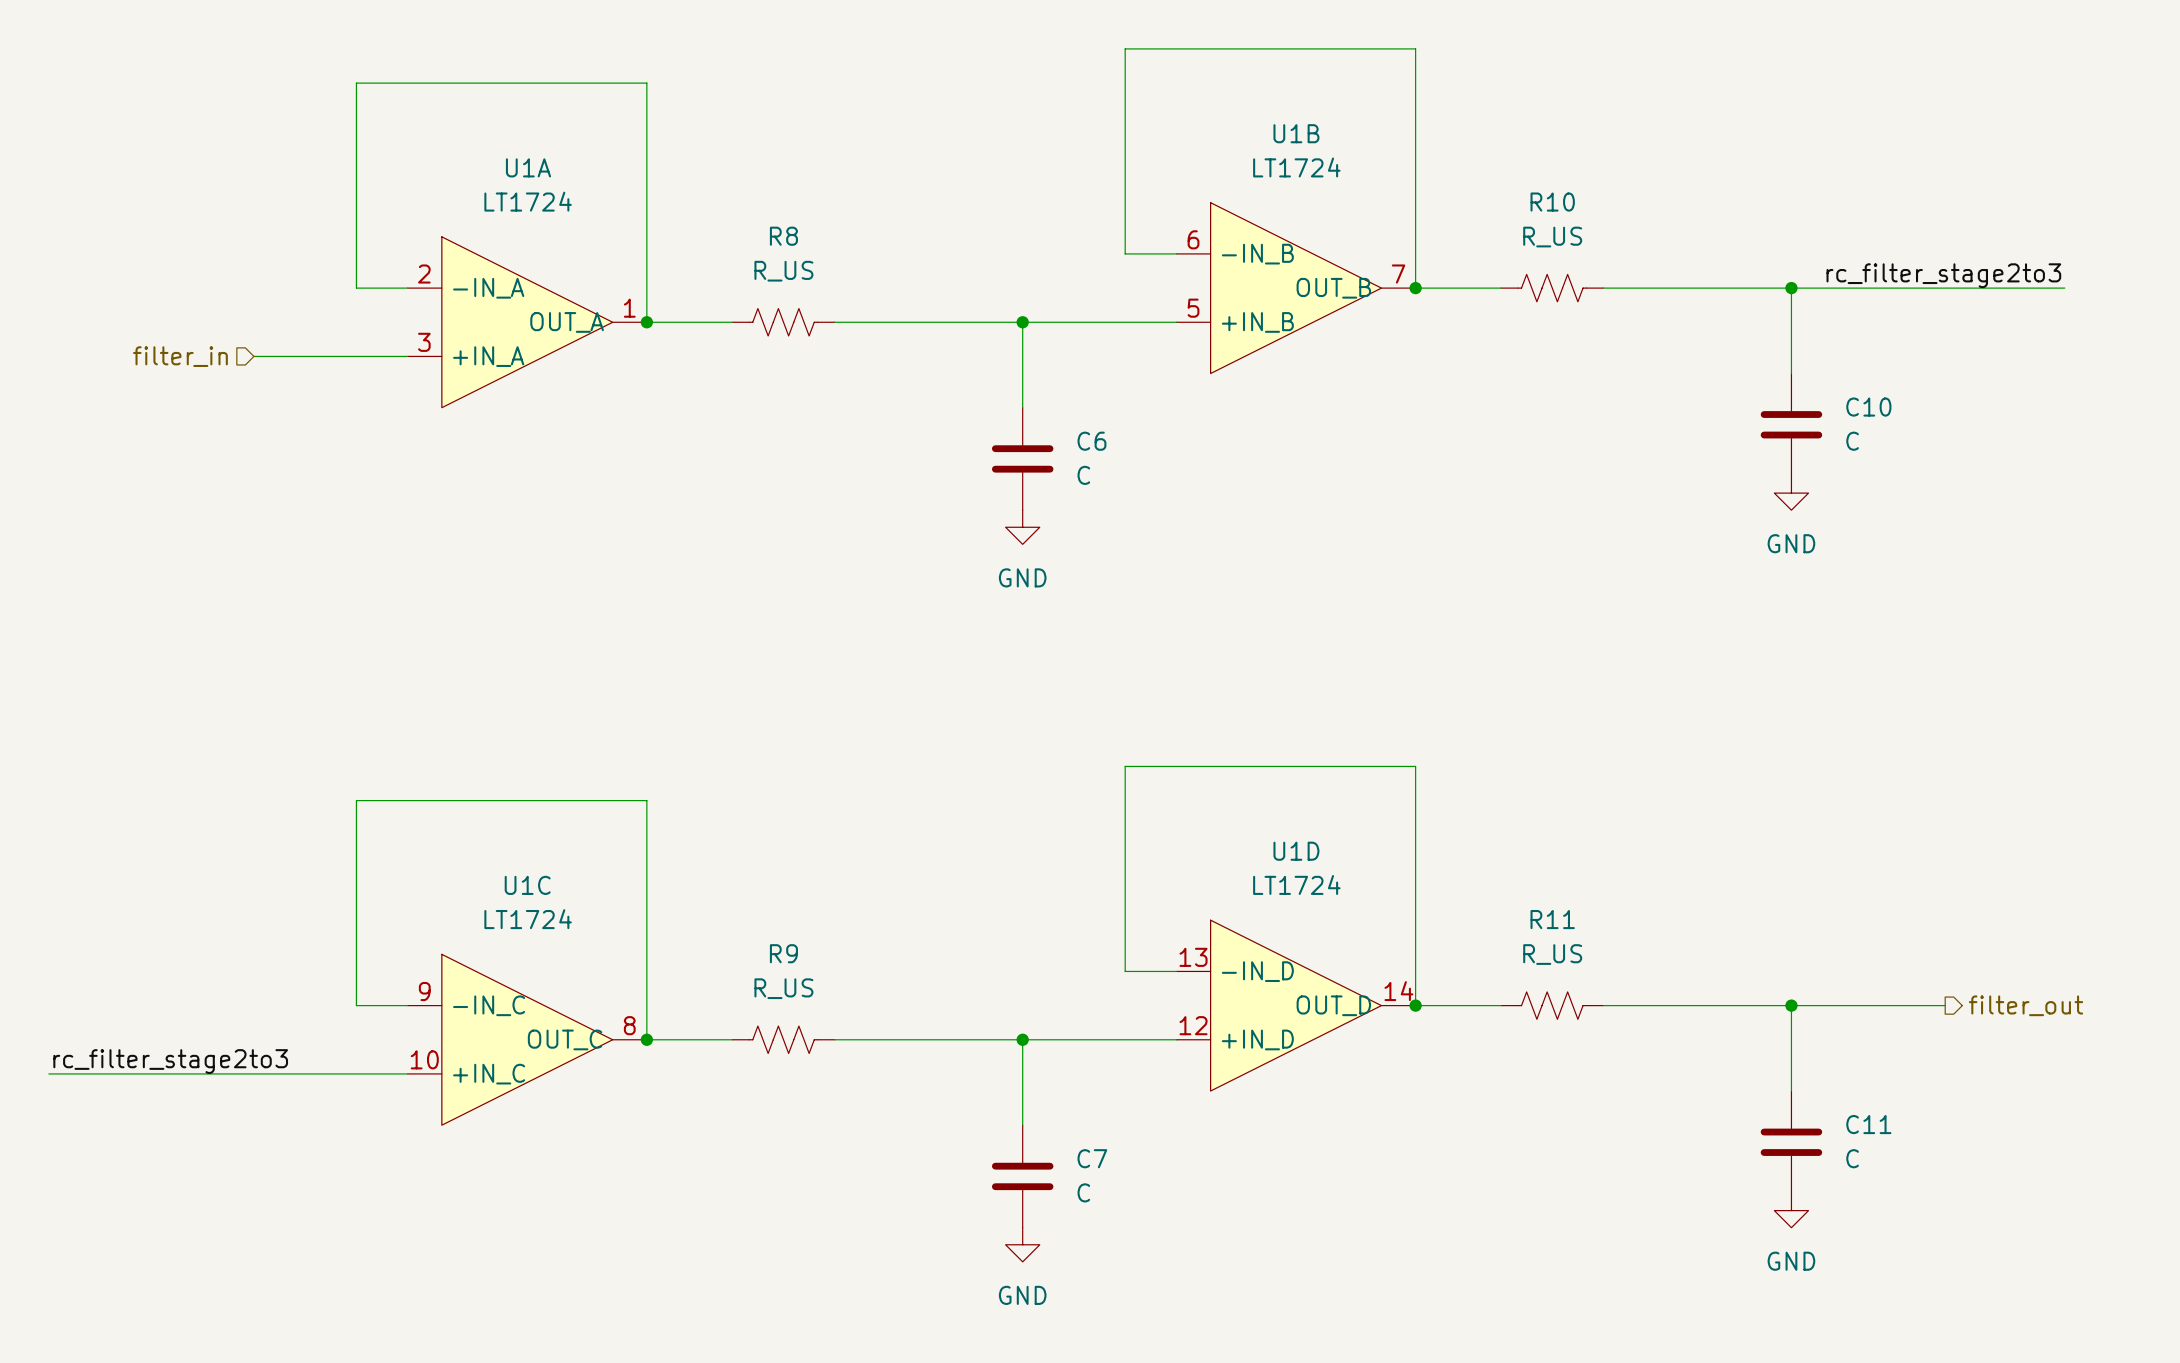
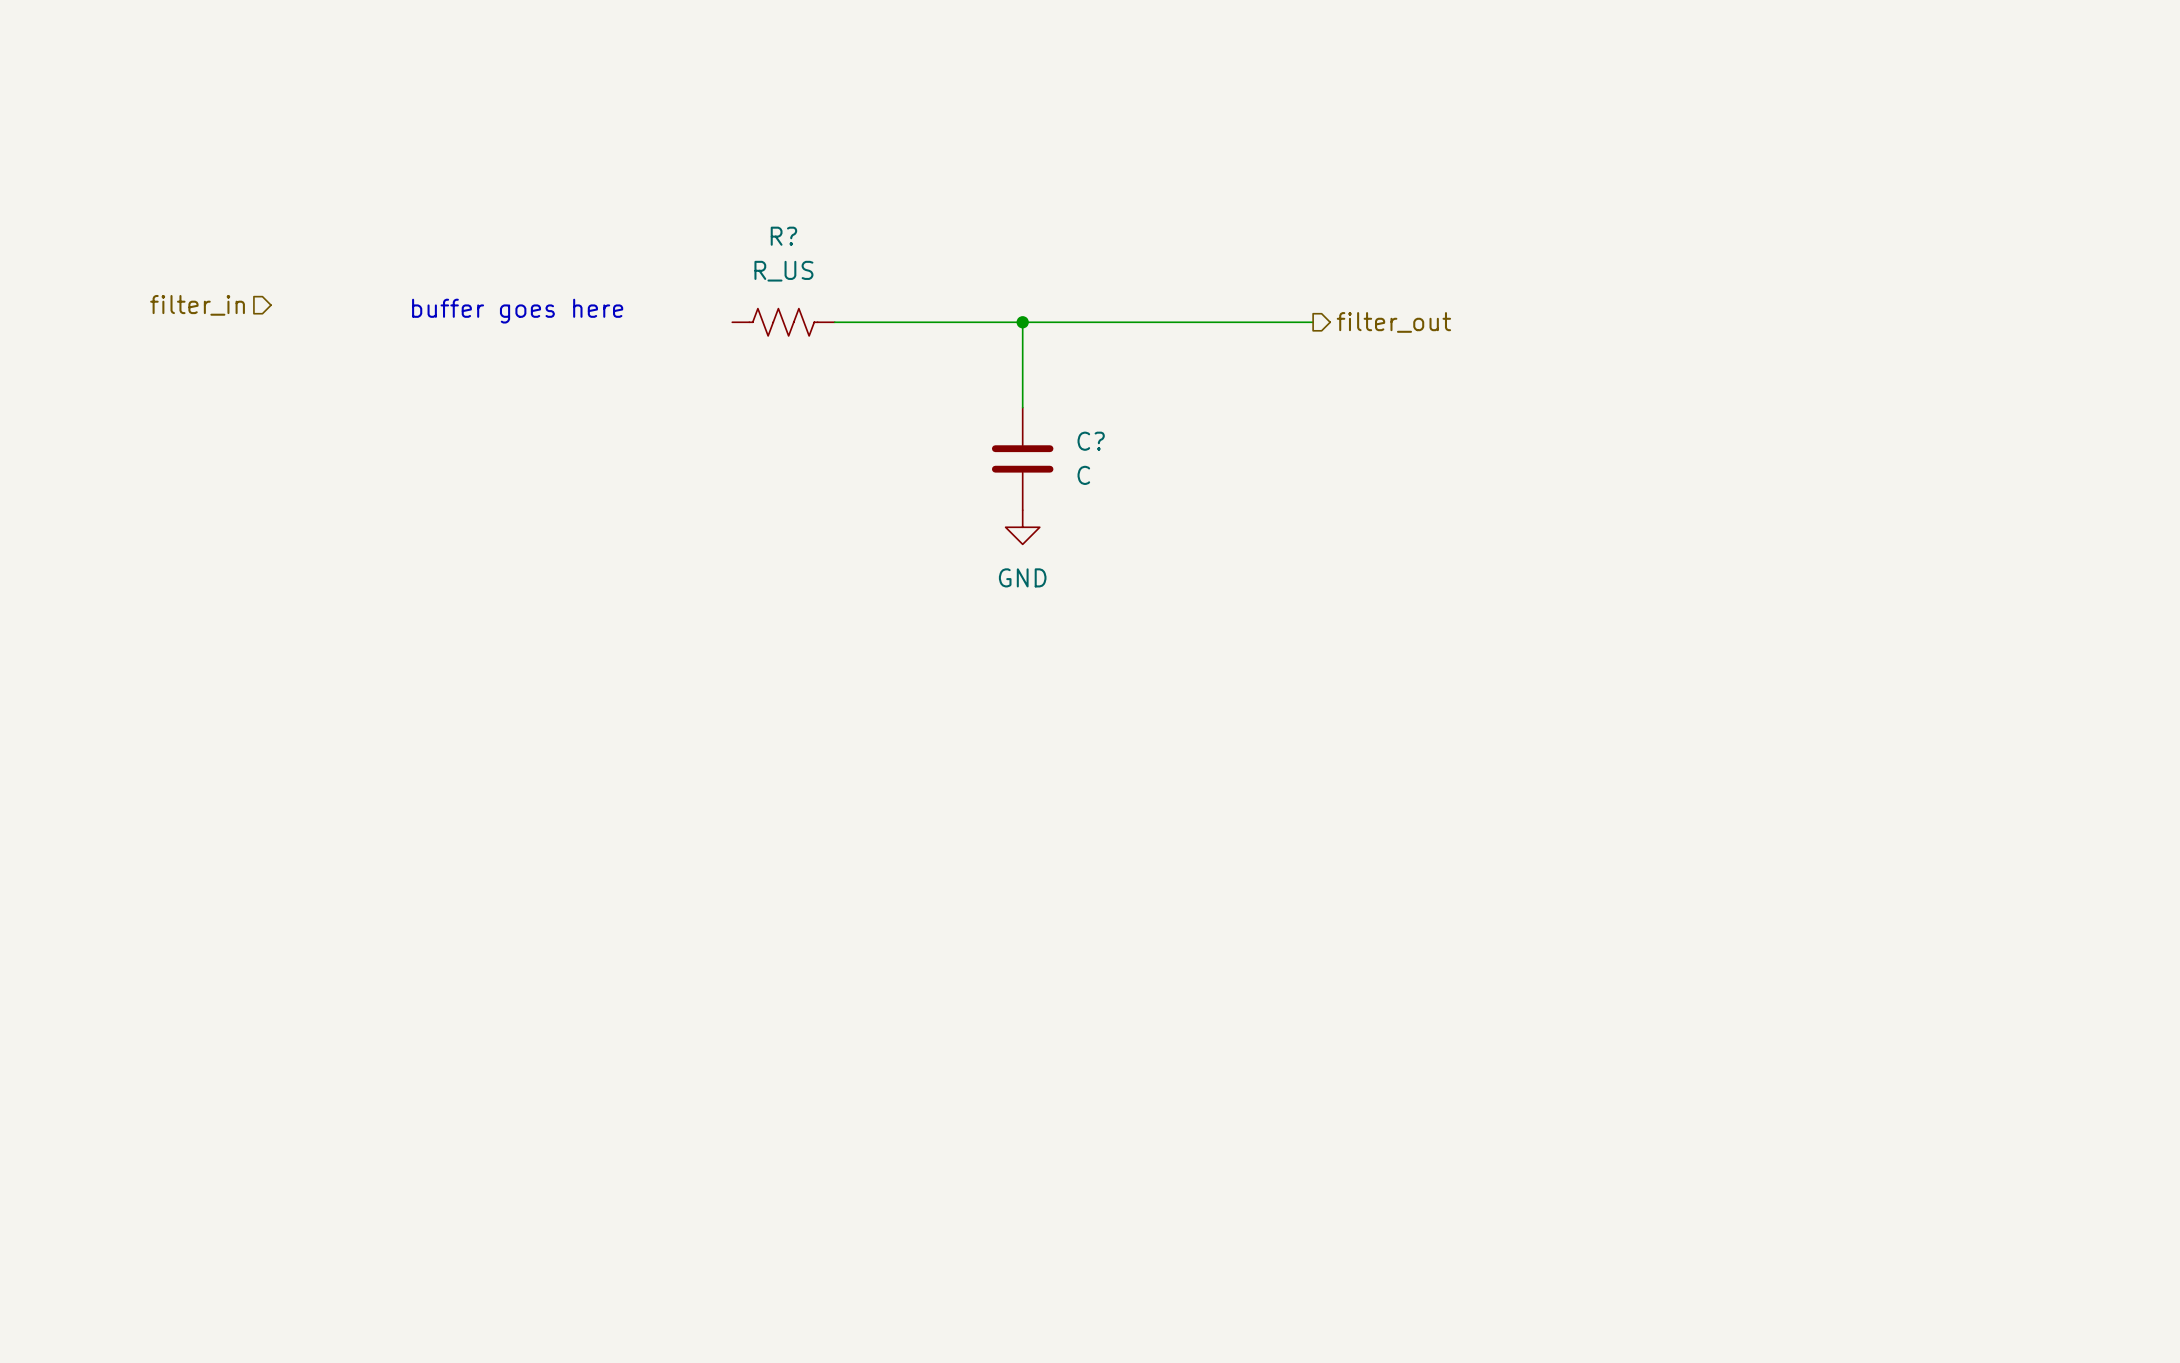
R8 name: R8 (783, 236) -> R? (783, 236)
wire: (1176, 253) (1125, 253) (1125, 48) (1415, 48) (1415, 288) (1501, 288) -> none
label: rc_filter_stage2to3 (1943, 275) -> none
wire: (407, 288) (356, 288) (356, 83) (646, 83) (646, 322) (732, 322) -> none
U1B: LT1724 (1296, 288) -> none
junction: (1415, 288) -> none
R10: R_US (1552, 288) -> none
wire: (1603, 288) (2064, 288) -> none
wire: (1791, 288) (1791, 373) -> none
junction: (1791, 288) -> none
text: none -> buffer goes here (517, 311)
U1A: LT1724 (527, 322) -> none
junction: (646, 322) -> none
hierarchical label: none -> filter_out (1393, 322)
hierarchical label position: filter_in (180, 356) -> filter_in (197, 305)
wire: (253, 356) (407, 356) -> none
C10: C (1791, 424) -> none
C6 name: C6 (1091, 441) -> C? (1091, 441)
power symbol: GND (1791, 493) -> none
wire: (1176, 971) (1125, 971) (1125, 766) (1415, 766) (1415, 1005) (1501, 1005) -> none
wire: (407, 1005) (356, 1005) (356, 800) (646, 800) (646, 1039) (732, 1039) -> none
U1D: LT1724 (1296, 1005) -> none
junction: (1415, 1005) -> none
R11: R_US (1552, 1005) -> none
wire: (1603, 1005) (1945, 1005) -> none
wire: (1791, 1005) (1791, 1091) -> none
junction: (1791, 1005) -> none
hierarchical label: filter_out (2026, 1005) -> none
U1C: LT1724 (527, 1039) -> none
junction: (646, 1039) -> none
R9: R_US (783, 1039) -> none
wire: (834, 1039) (1176, 1039) -> none
wire: (1022, 1039) (1022, 1125) -> none
junction: (1022, 1039) -> none
label: rc_filter_stage2to3 (170, 1061) -> none
wire: (48, 1073) (407, 1073) -> none
C11: C (1791, 1142) -> none
C7: C (1022, 1176) -> none
power symbol: GND (1791, 1210) -> none
power symbol: GND (1022, 1244) -> none

